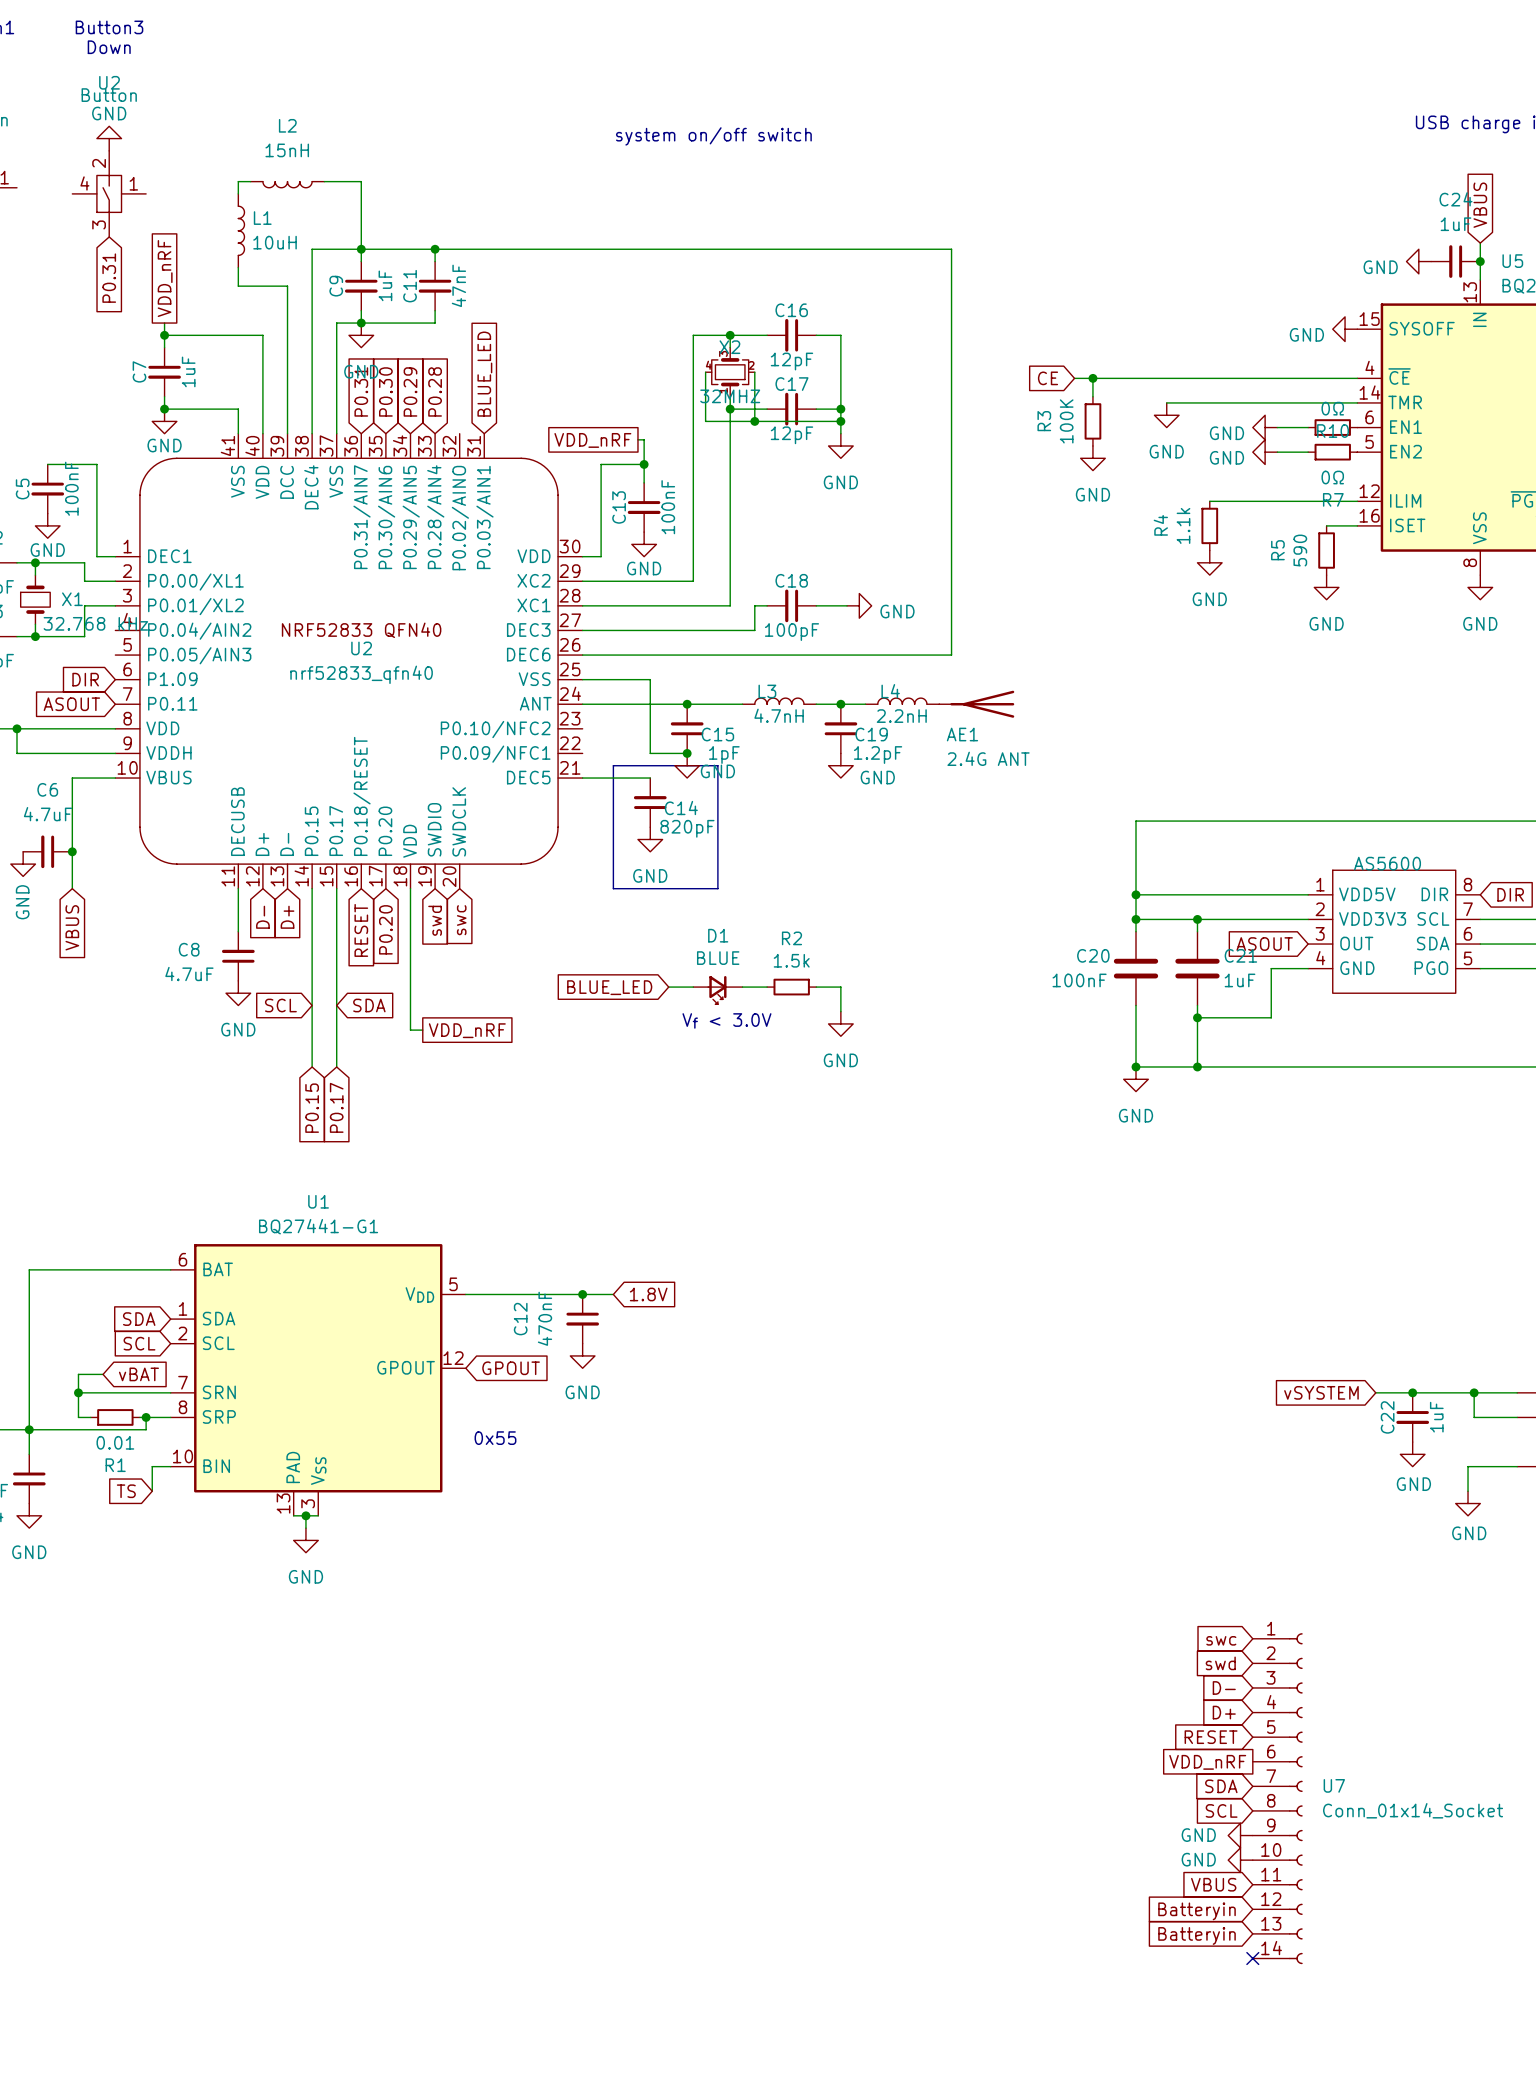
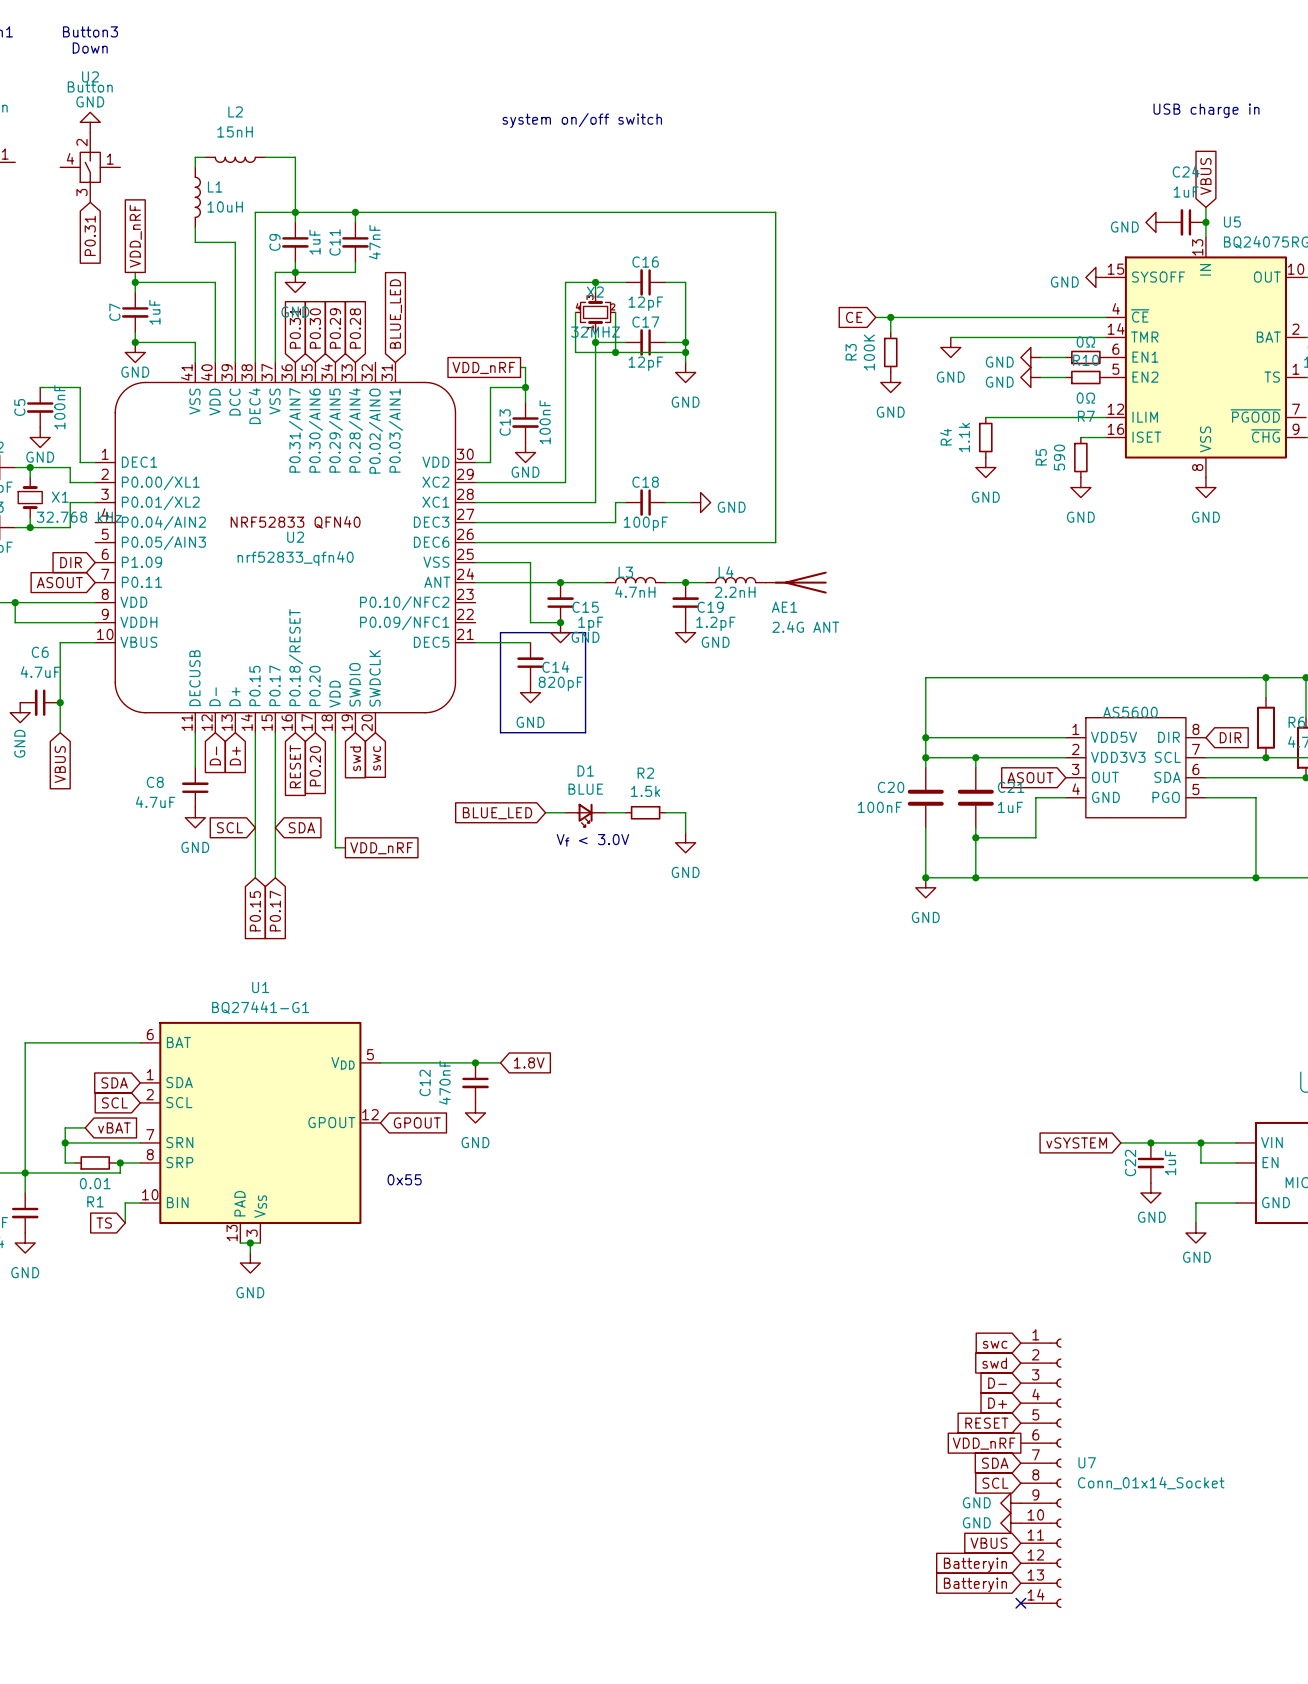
U2 pin name: D+ (262, 844) -> D- (214, 696)
U2 pin name: D- (287, 844) -> D+ (234, 696)

